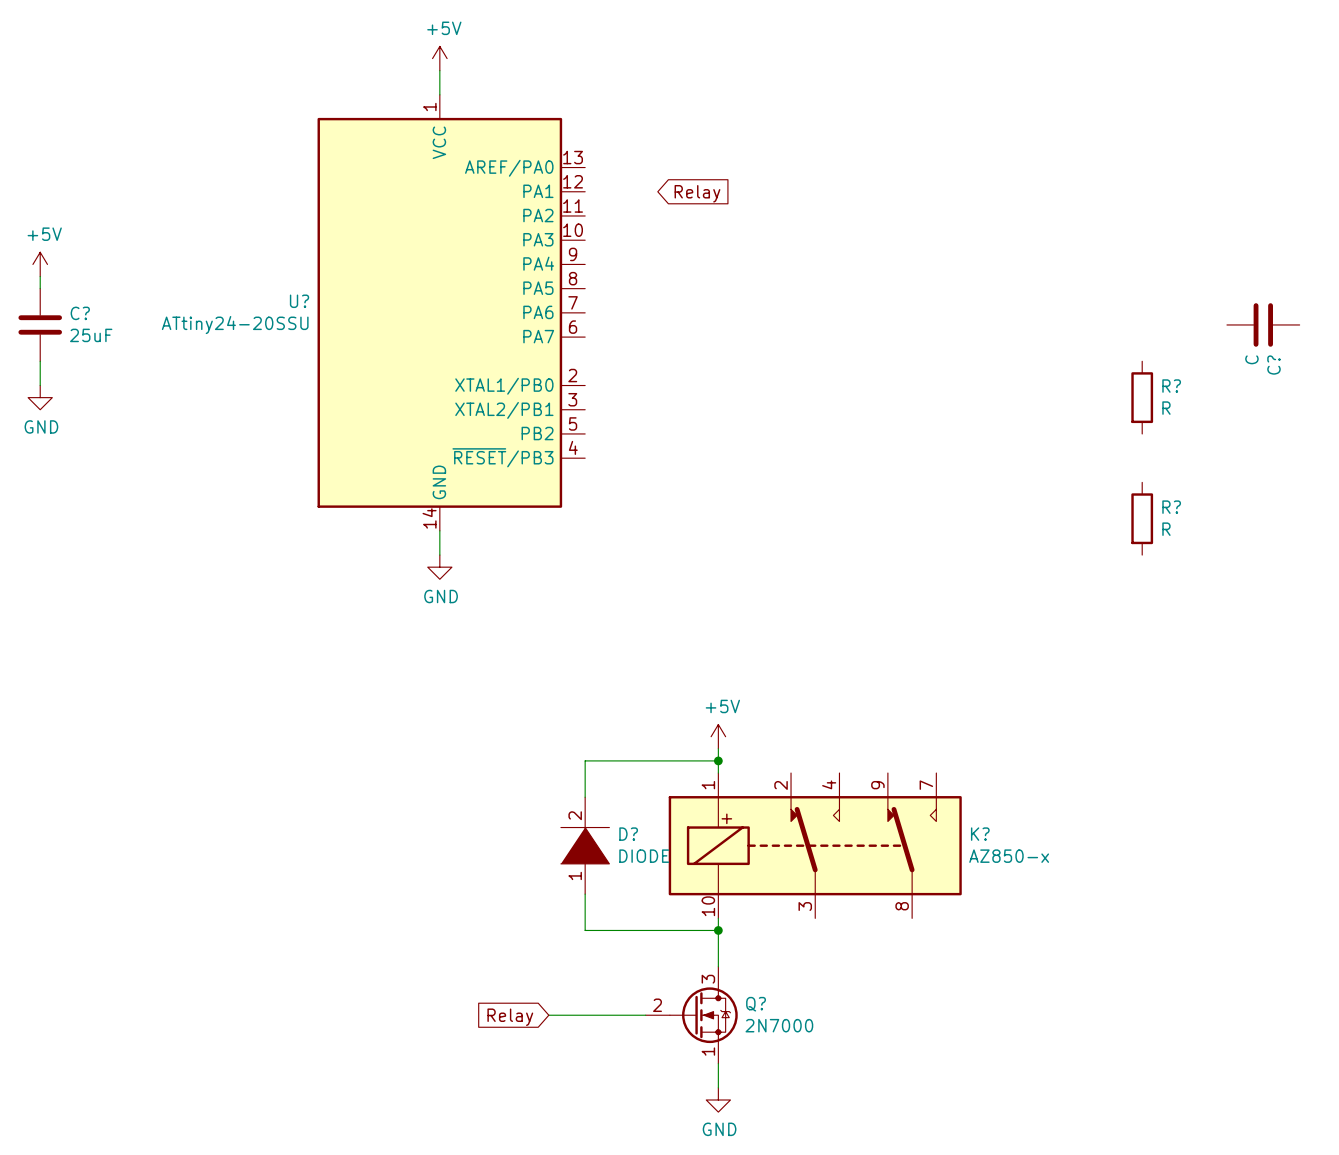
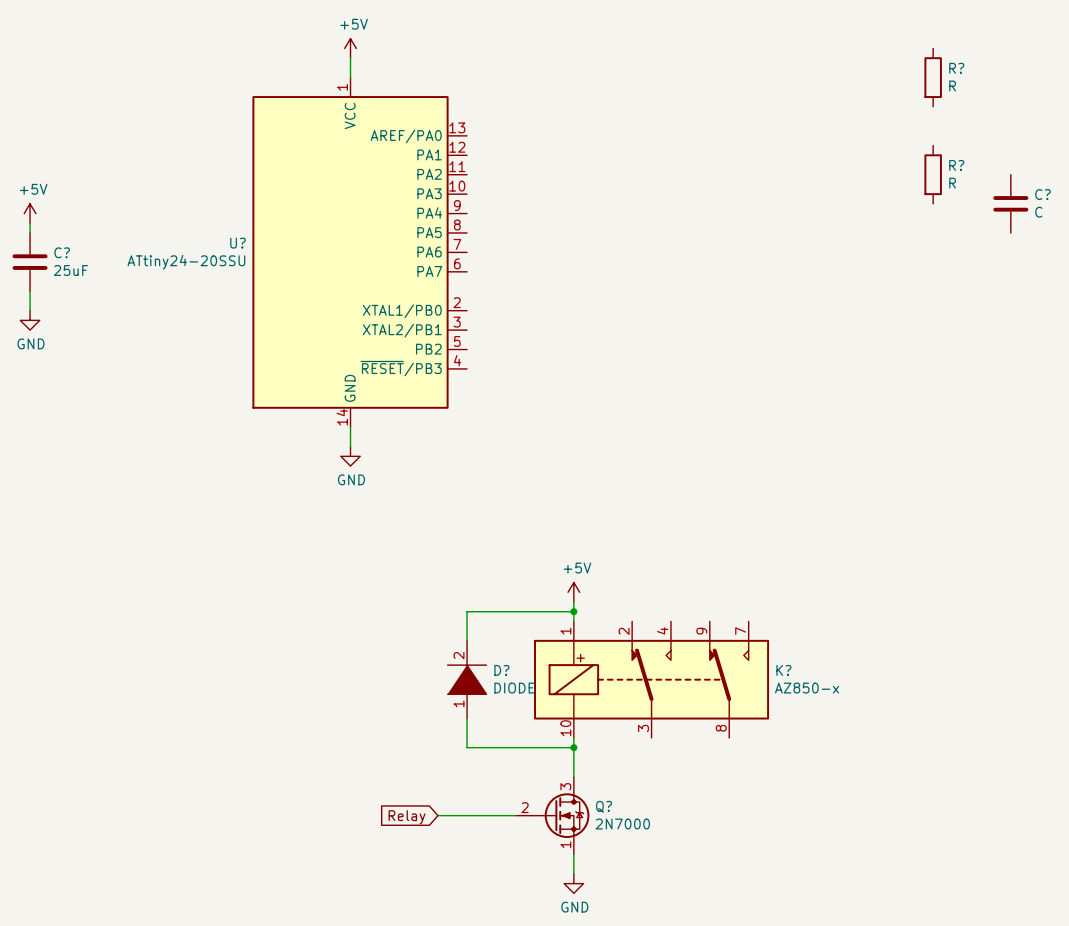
R?: none -> R (933, 77)
global label: Relay (697, 193) -> none
R?: none -> R (933, 174)
C? rotation: 0° (1263, 324) -> 90° clockwise (1010, 203)
C? position: (1263, 324) -> (1010, 203)
C? value position: C (1251, 359) -> C (1038, 212)
C? name position: C? (1273, 365) -> C? (1042, 194)
R?: R (1142, 397) -> none
R?: R (1142, 518) -> none

